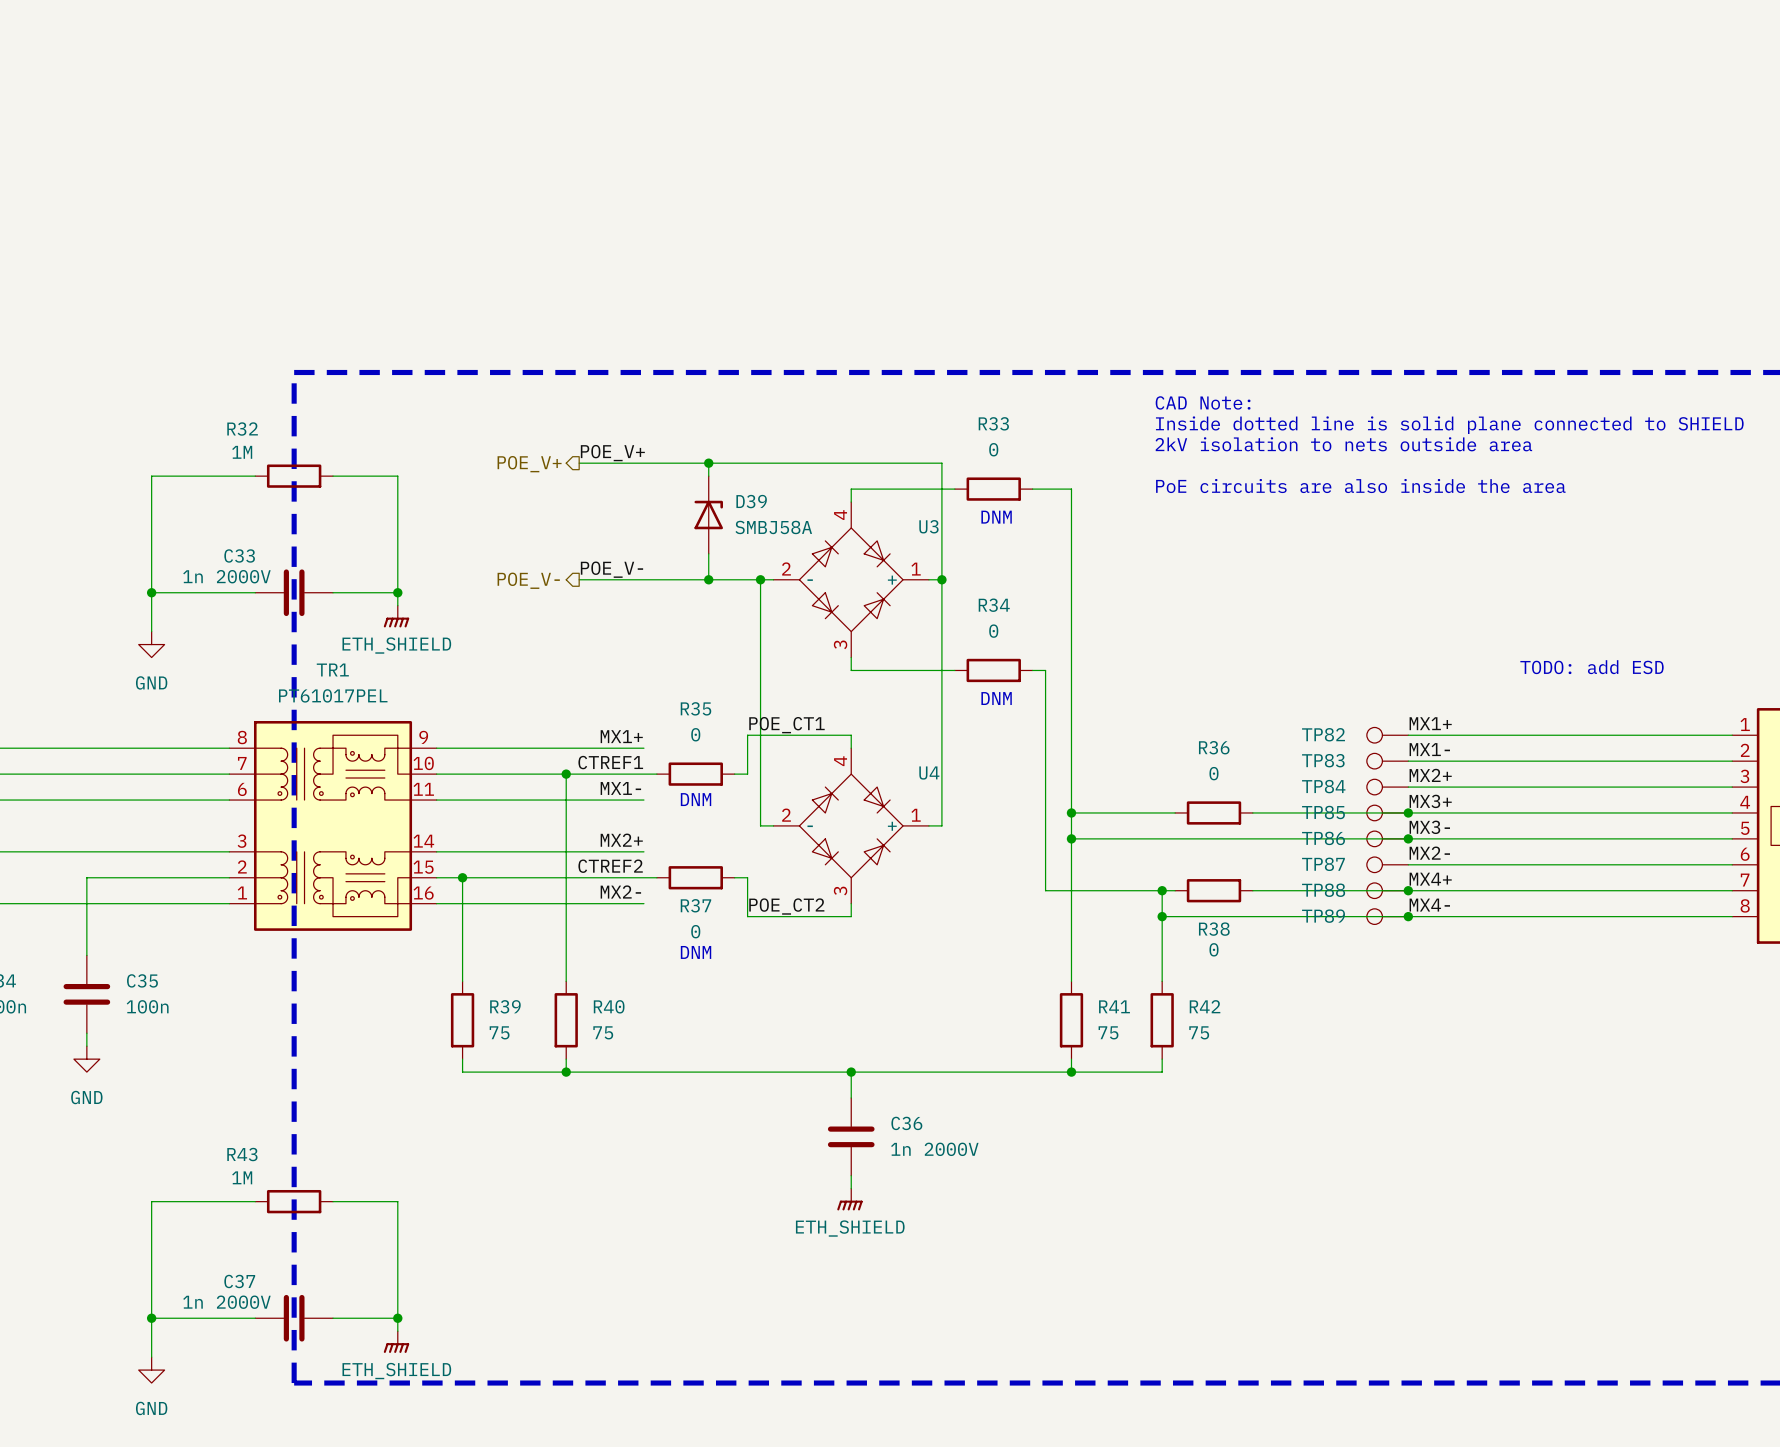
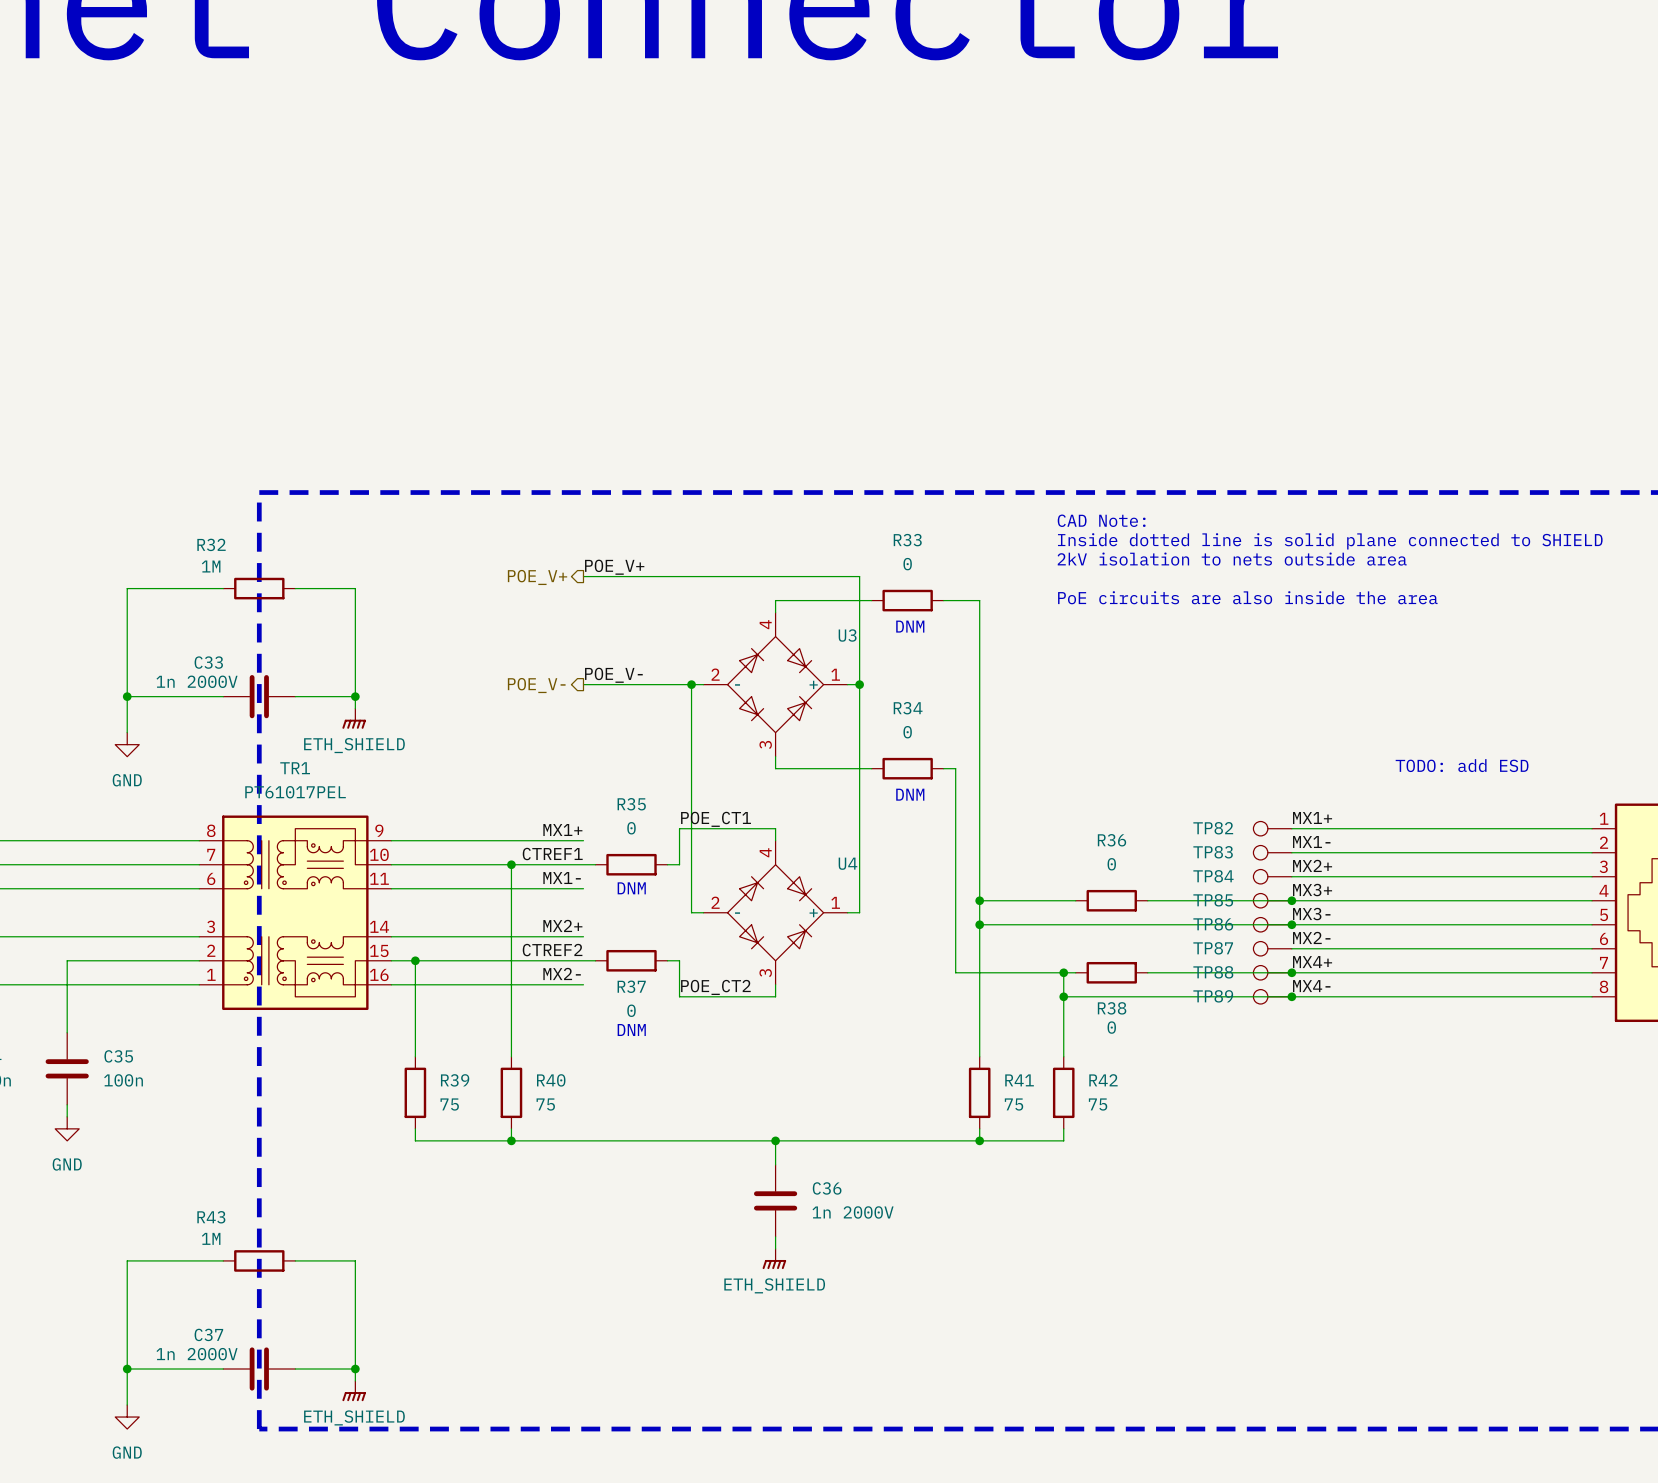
label position: POE_V+ (612, 453) -> POE_V+ (614, 567)
wire: (579, 463) (643, 463) -> none
wire: (708, 463) (708, 476) -> none
junction: (708, 463) -> none
hierarchical label position: POE_V+ (529, 464) -> POE_V+ (537, 577)
D39: SMBJ58A (708, 515) -> none
wire: (708, 553) (708, 579) -> none
label position: POE_V- (611, 569) -> POE_V- (613, 675)
wire: (579, 579) (643, 579) -> none
junction: (708, 579) -> none
hierarchical label position: POE_V- (528, 580) -> POE_V- (536, 685)

